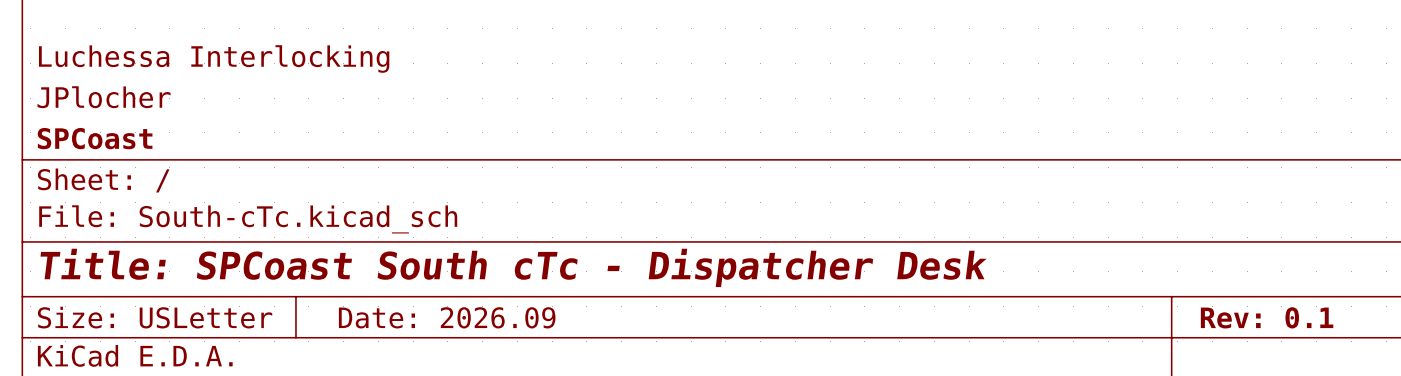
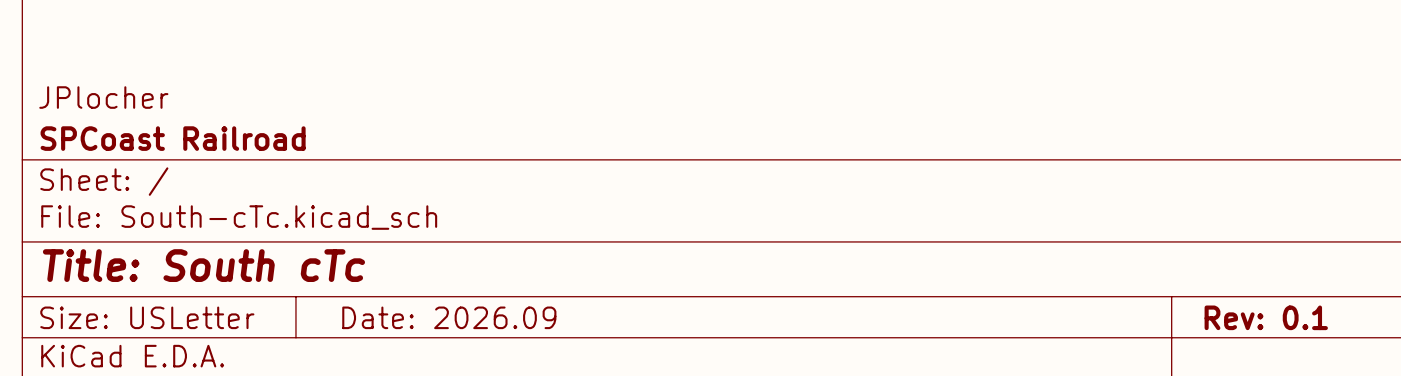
title block: Luchessa Interlocking (214, 59) -> none
title block: SPCoast (95, 138) -> SPCoast Railroad (173, 138)
title block: Title: SPCoast South cTc - Dispatcher Desk (513, 267) -> Title: South cTc (203, 265)

